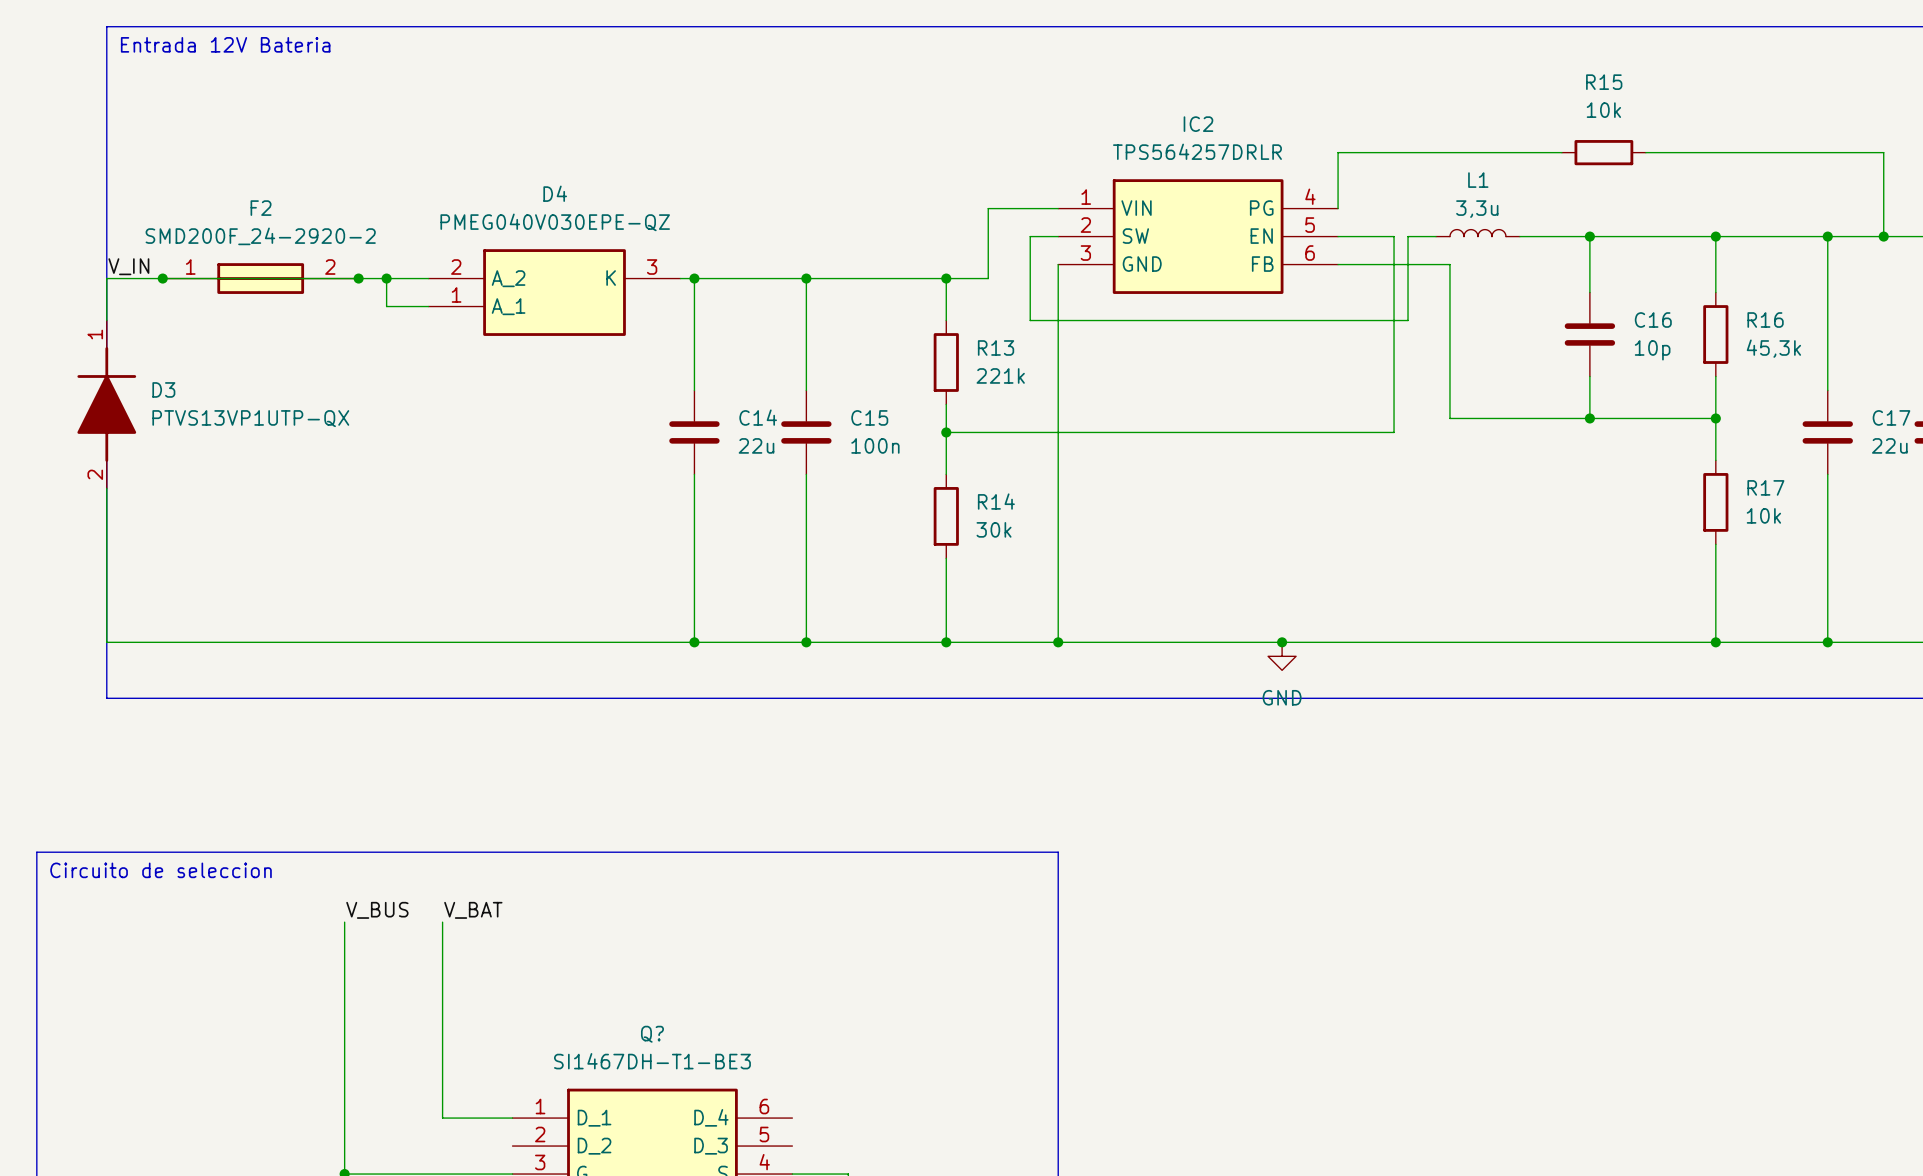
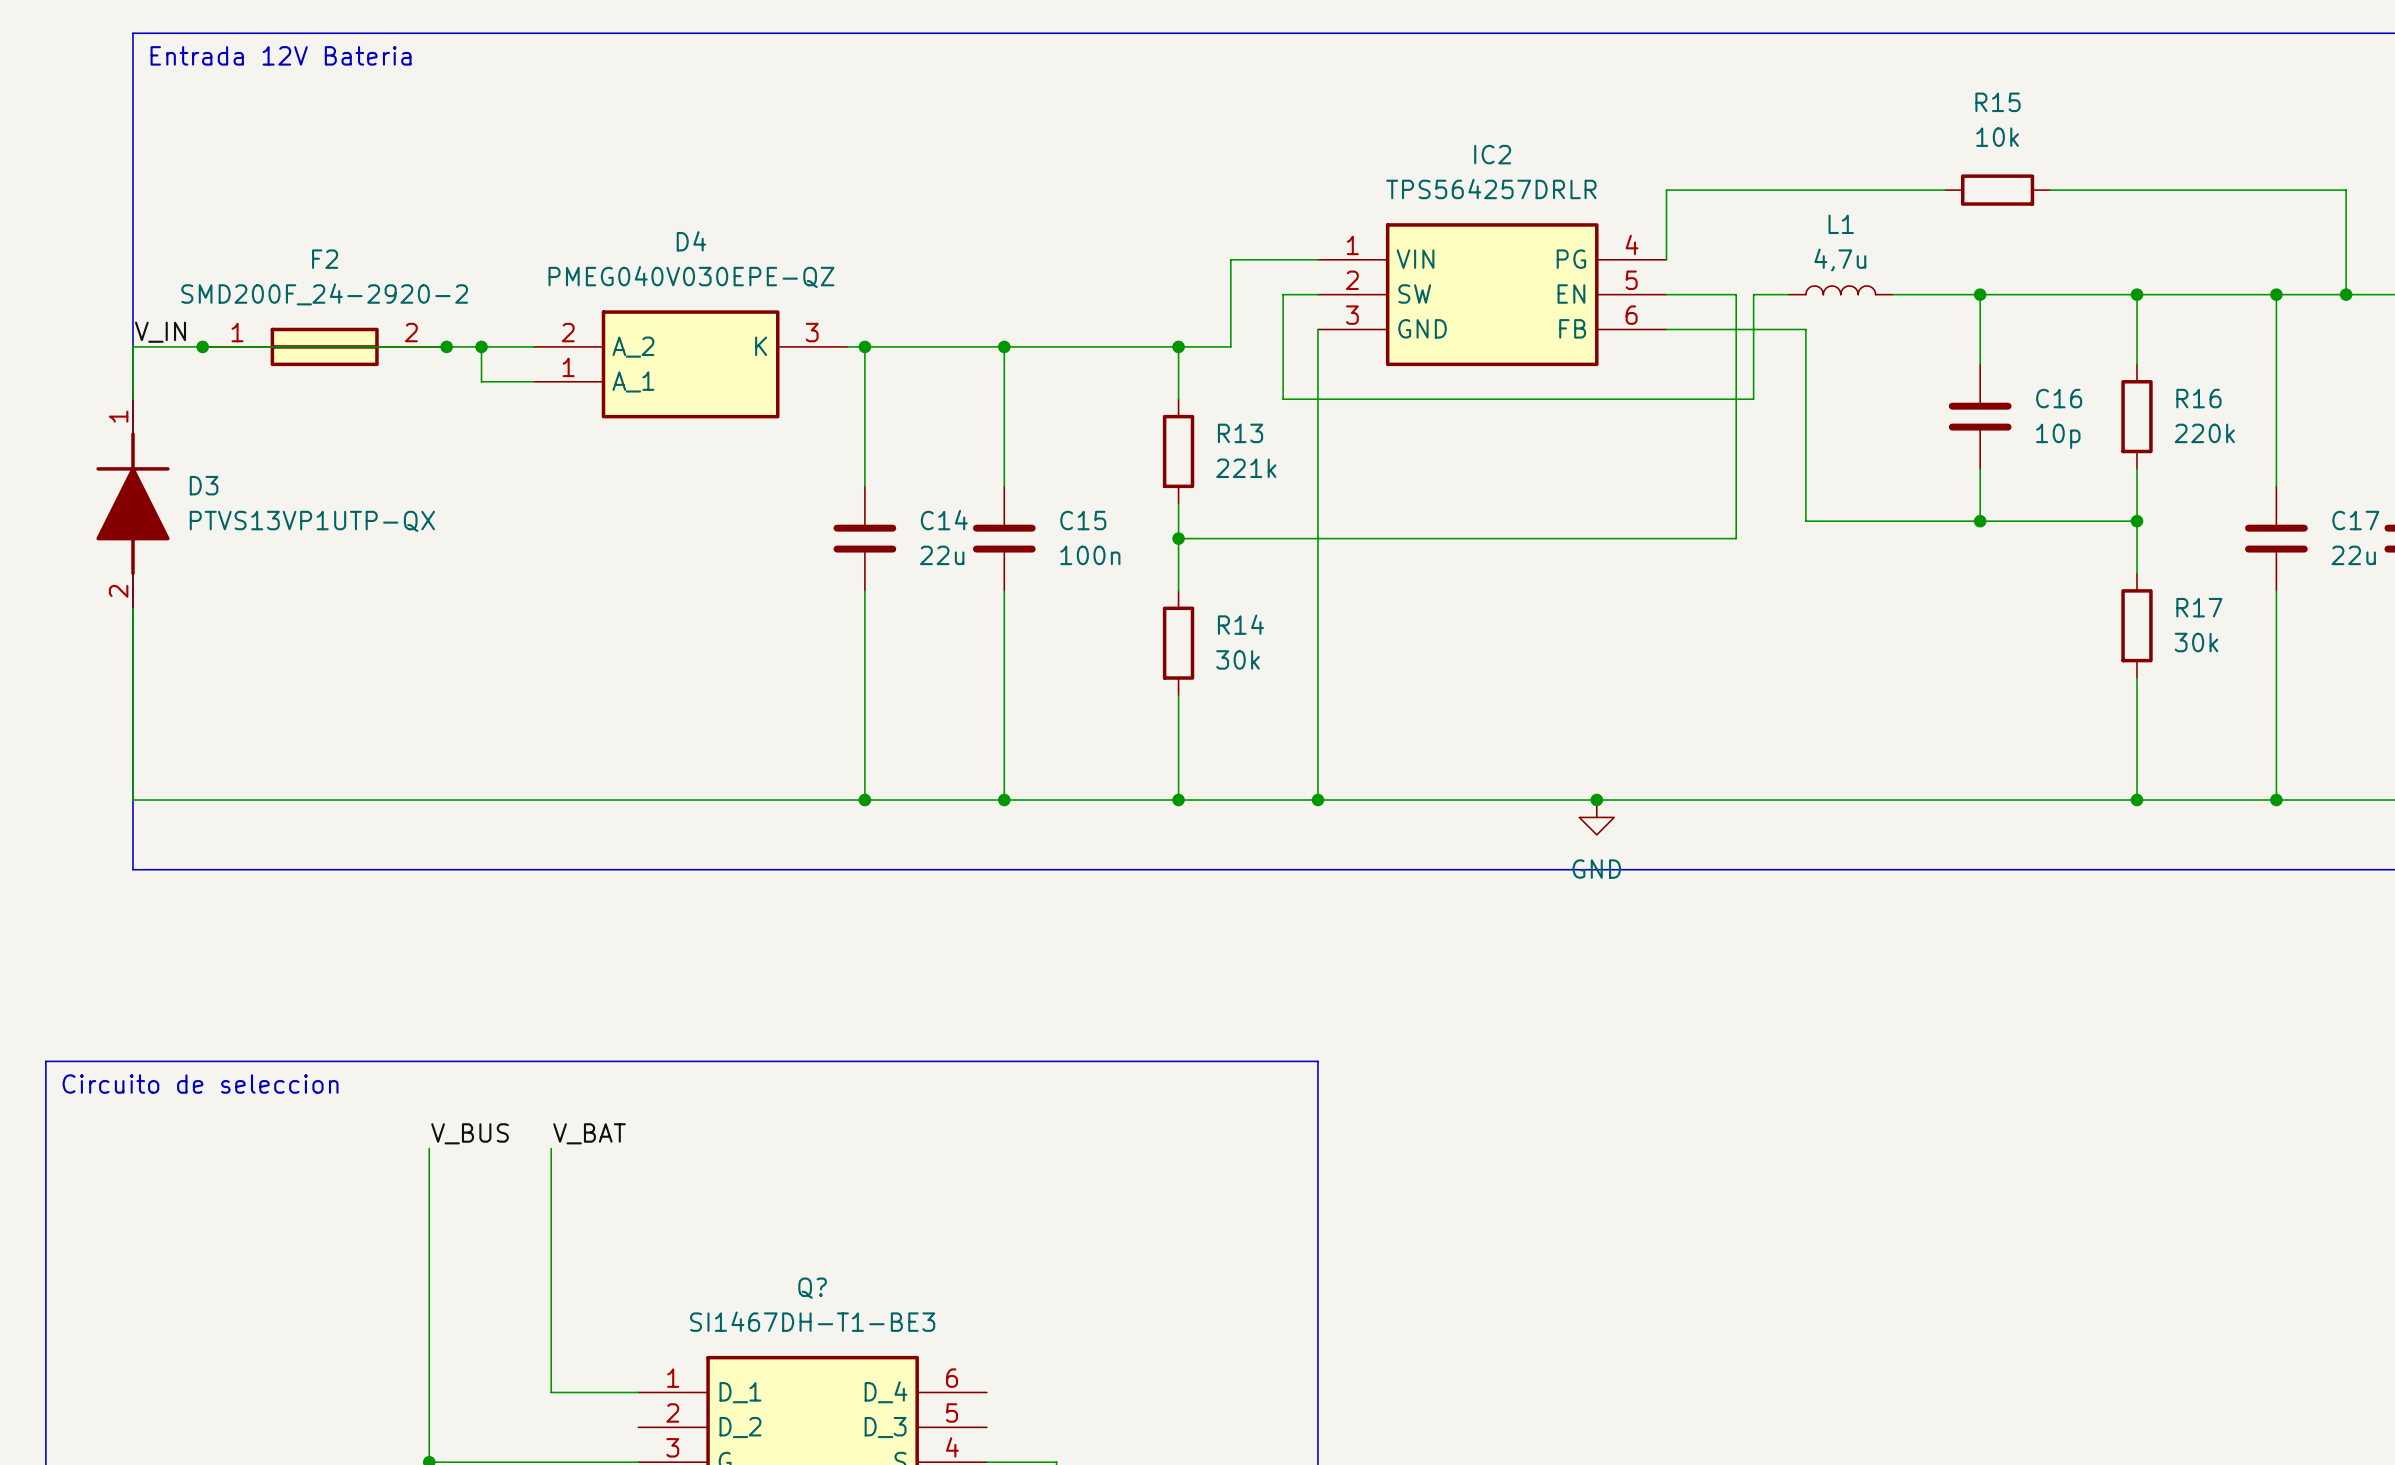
L1 value: 3,3u (1477, 209) -> 4,7u (1840, 259)
R16 value: 45,3k (1773, 348) -> 220k (2204, 433)
R17 value: 10k (1763, 515) -> 30k (2196, 642)

